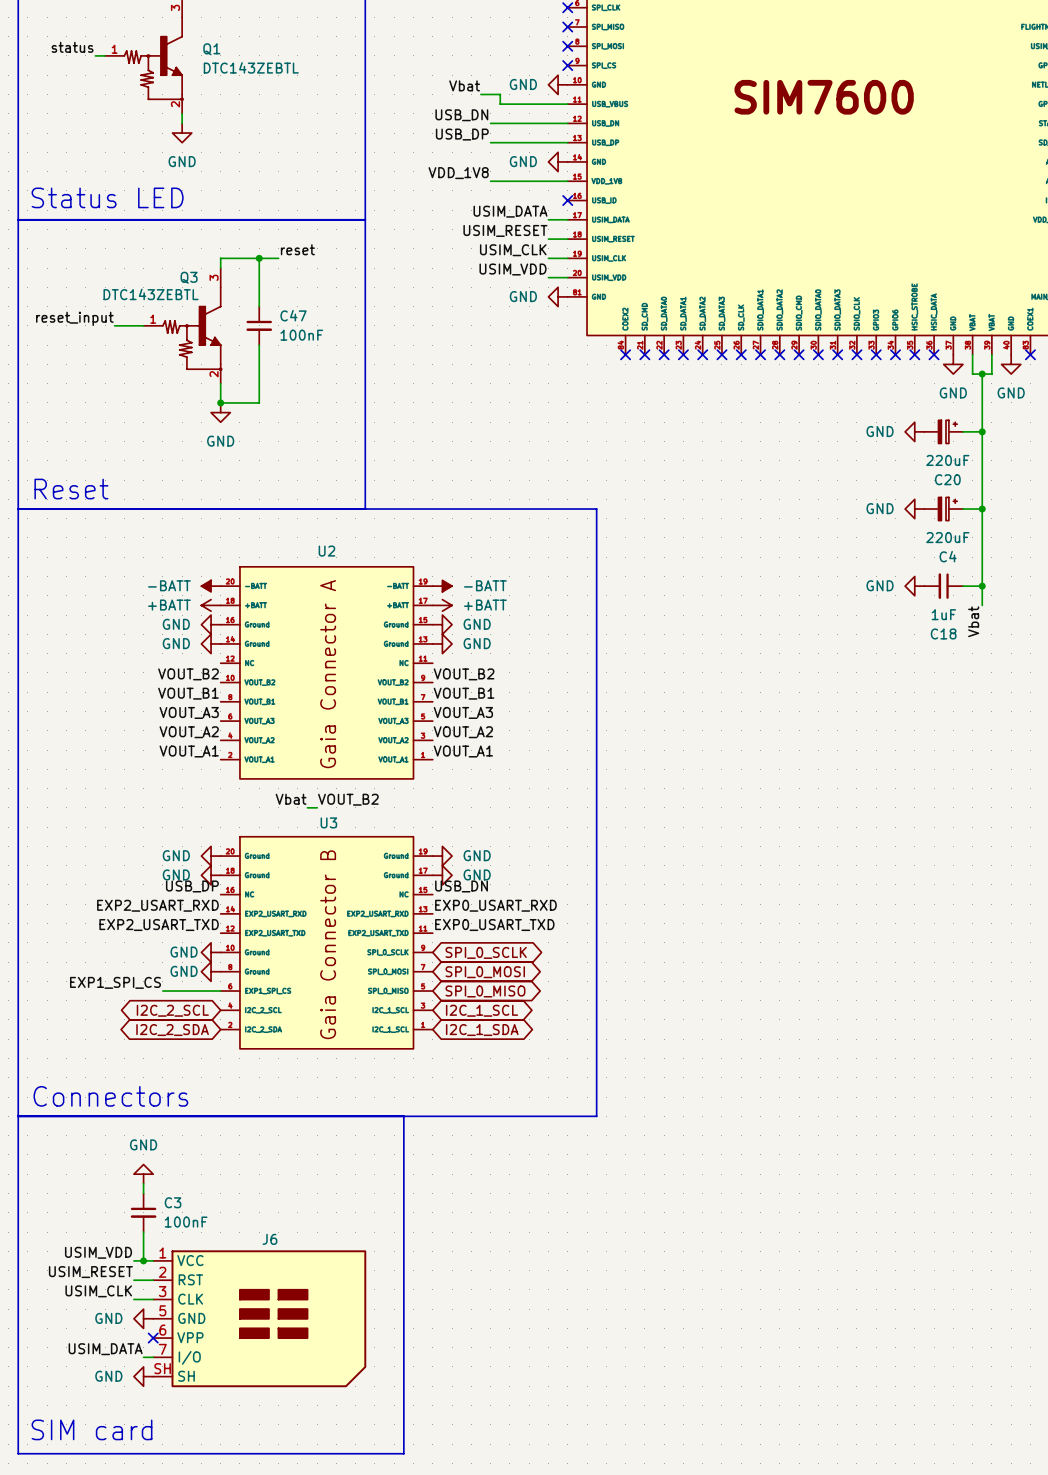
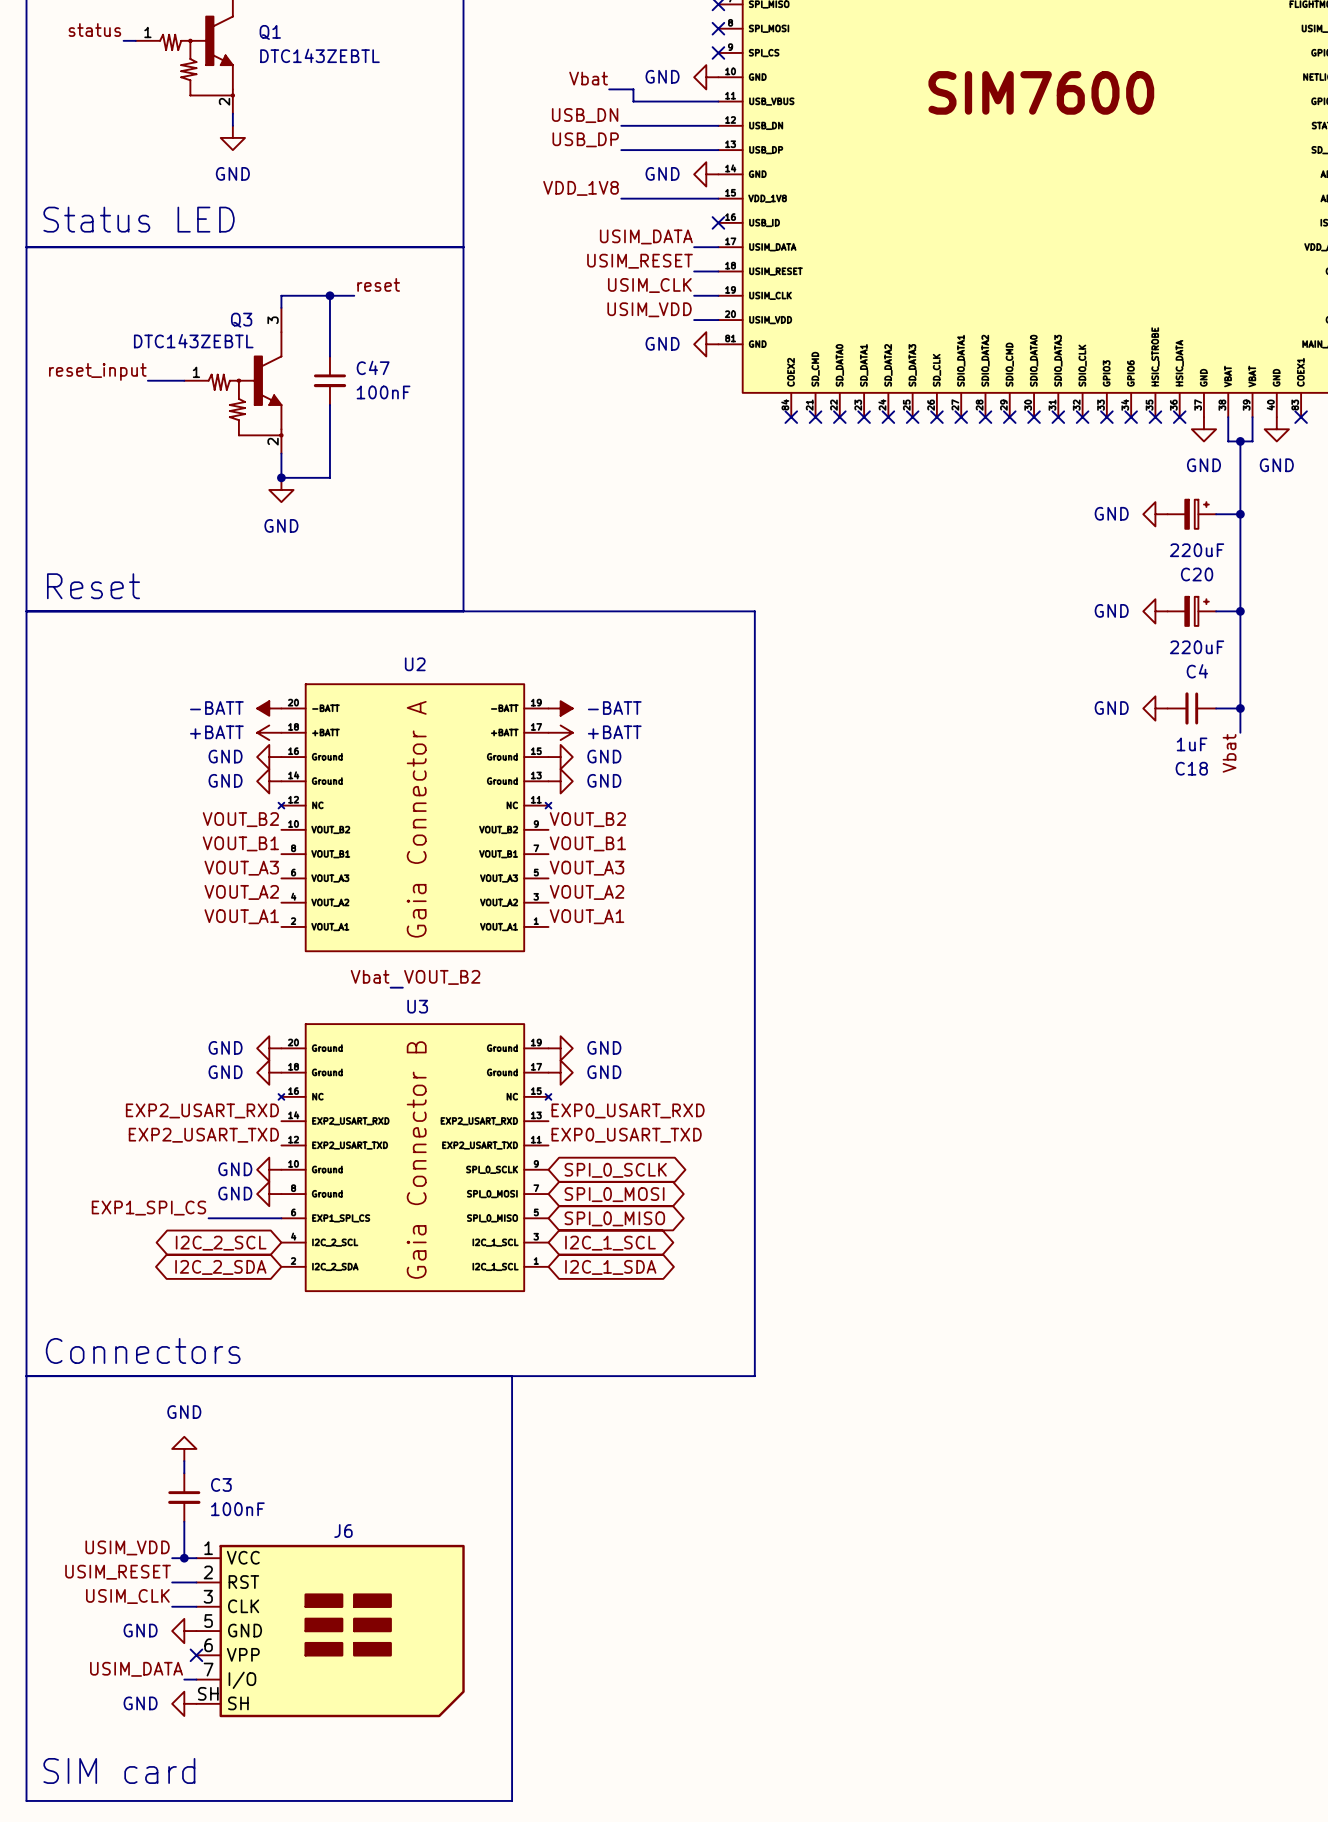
U2 symbol: [220, 566, 433, 779] -> [278, 684, 552, 952]
U3 symbol: [220, 836, 433, 1049] -> [278, 1024, 552, 1292]
label: USB_DP (192, 886) -> none
label: USB_DN (461, 886) -> none

